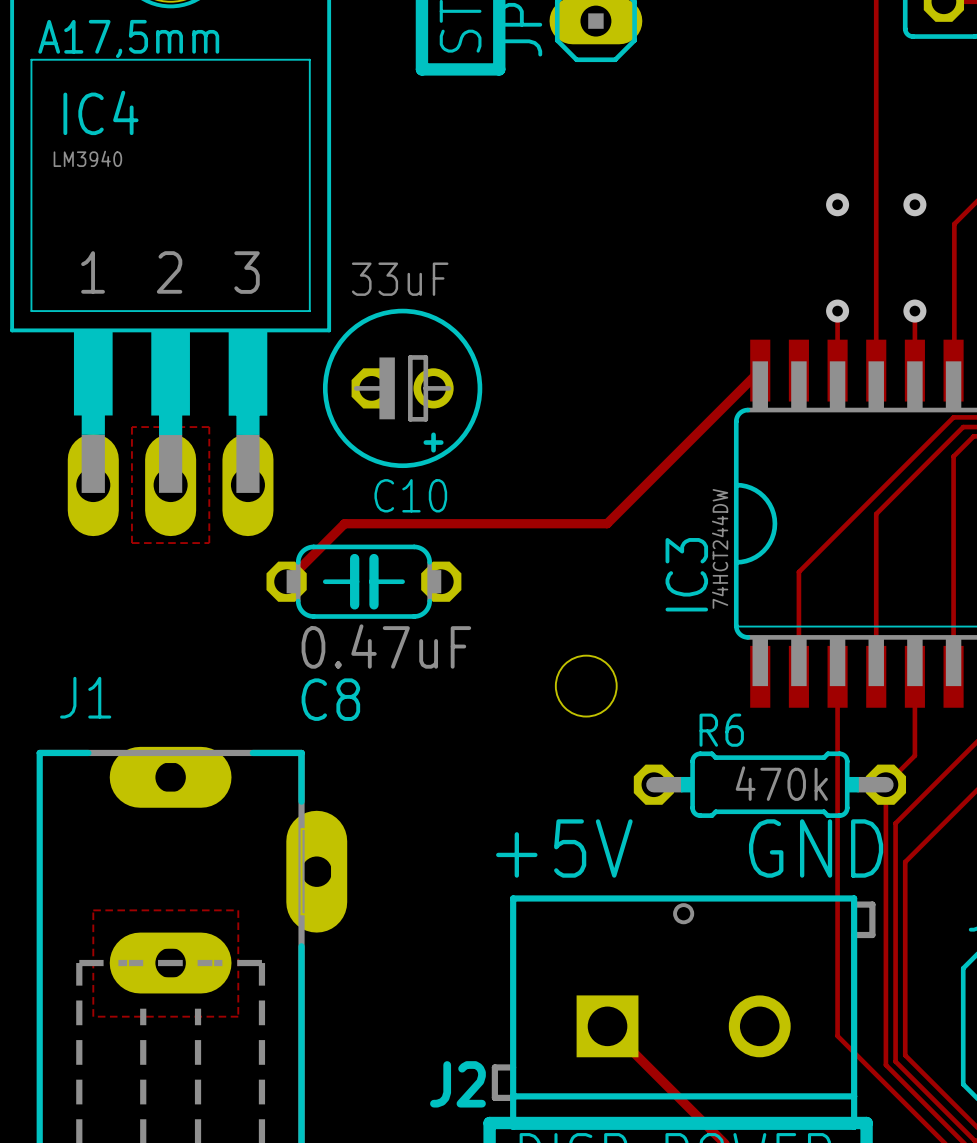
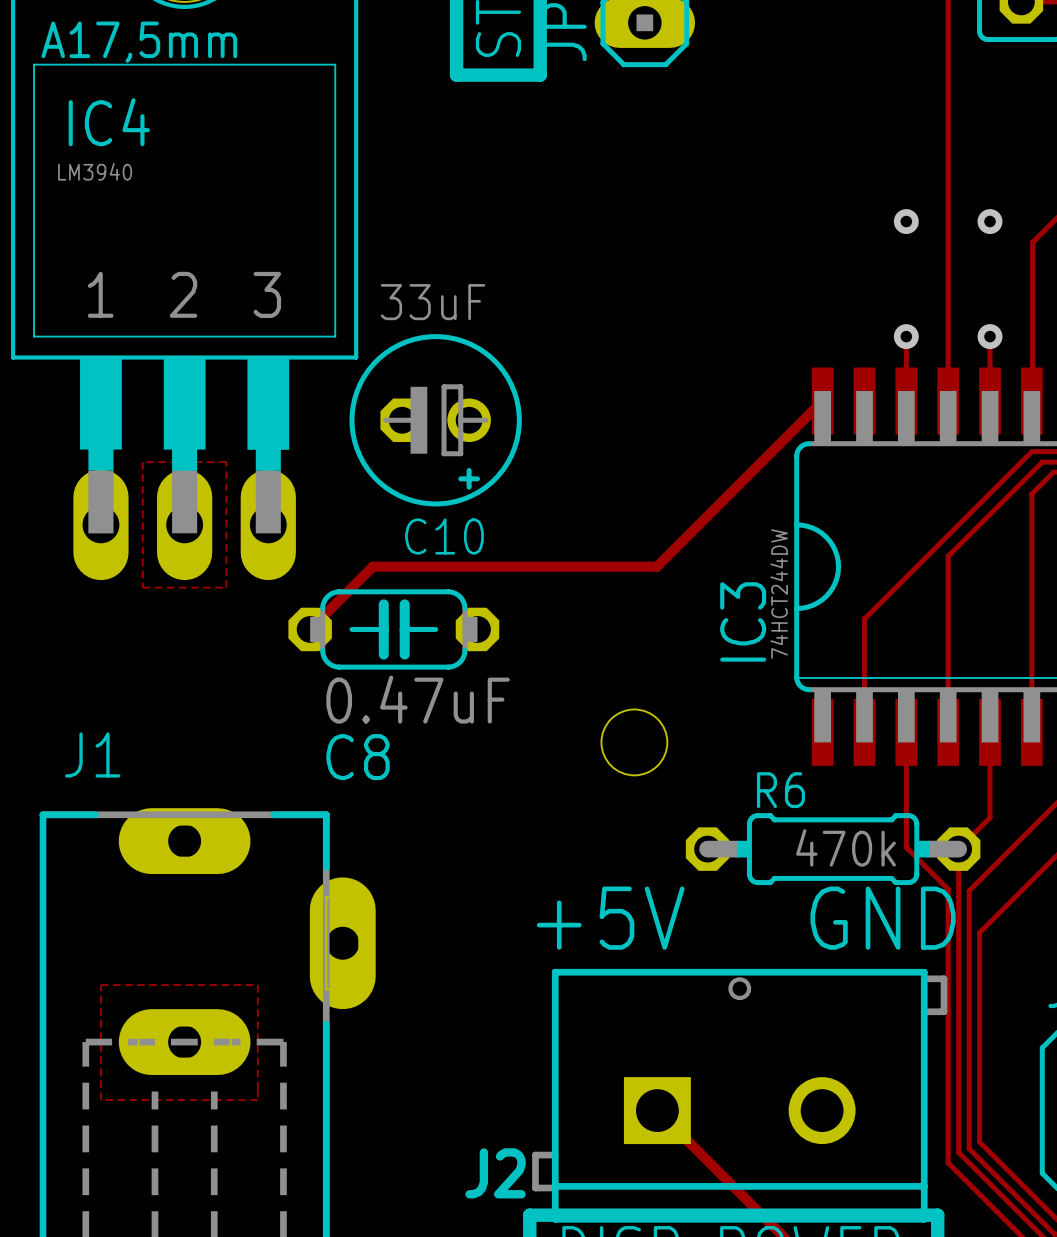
track: (837, 783) (837, 1036) (876, 1074) -> (906, 847) (948, 889) (948, 1162)

